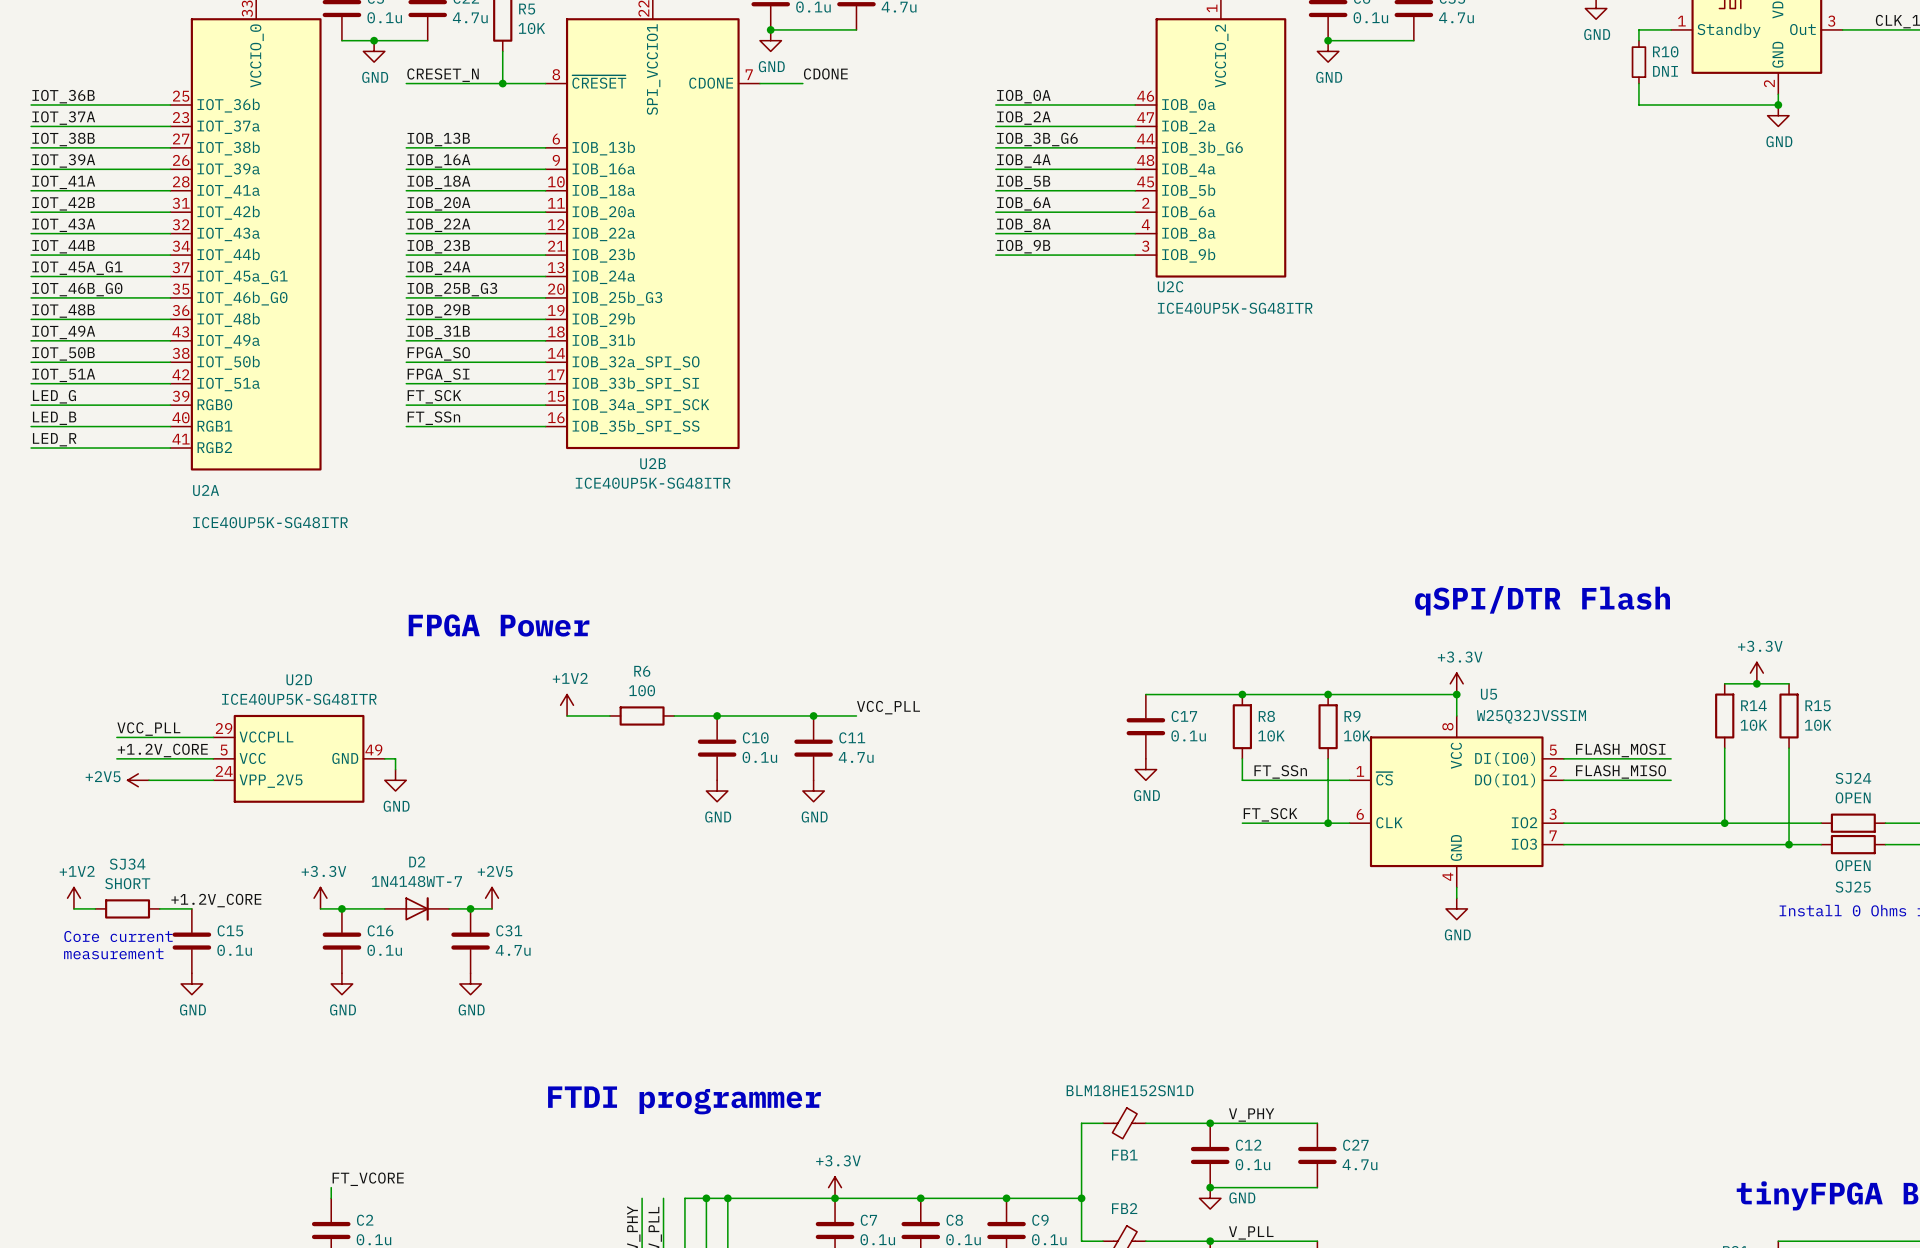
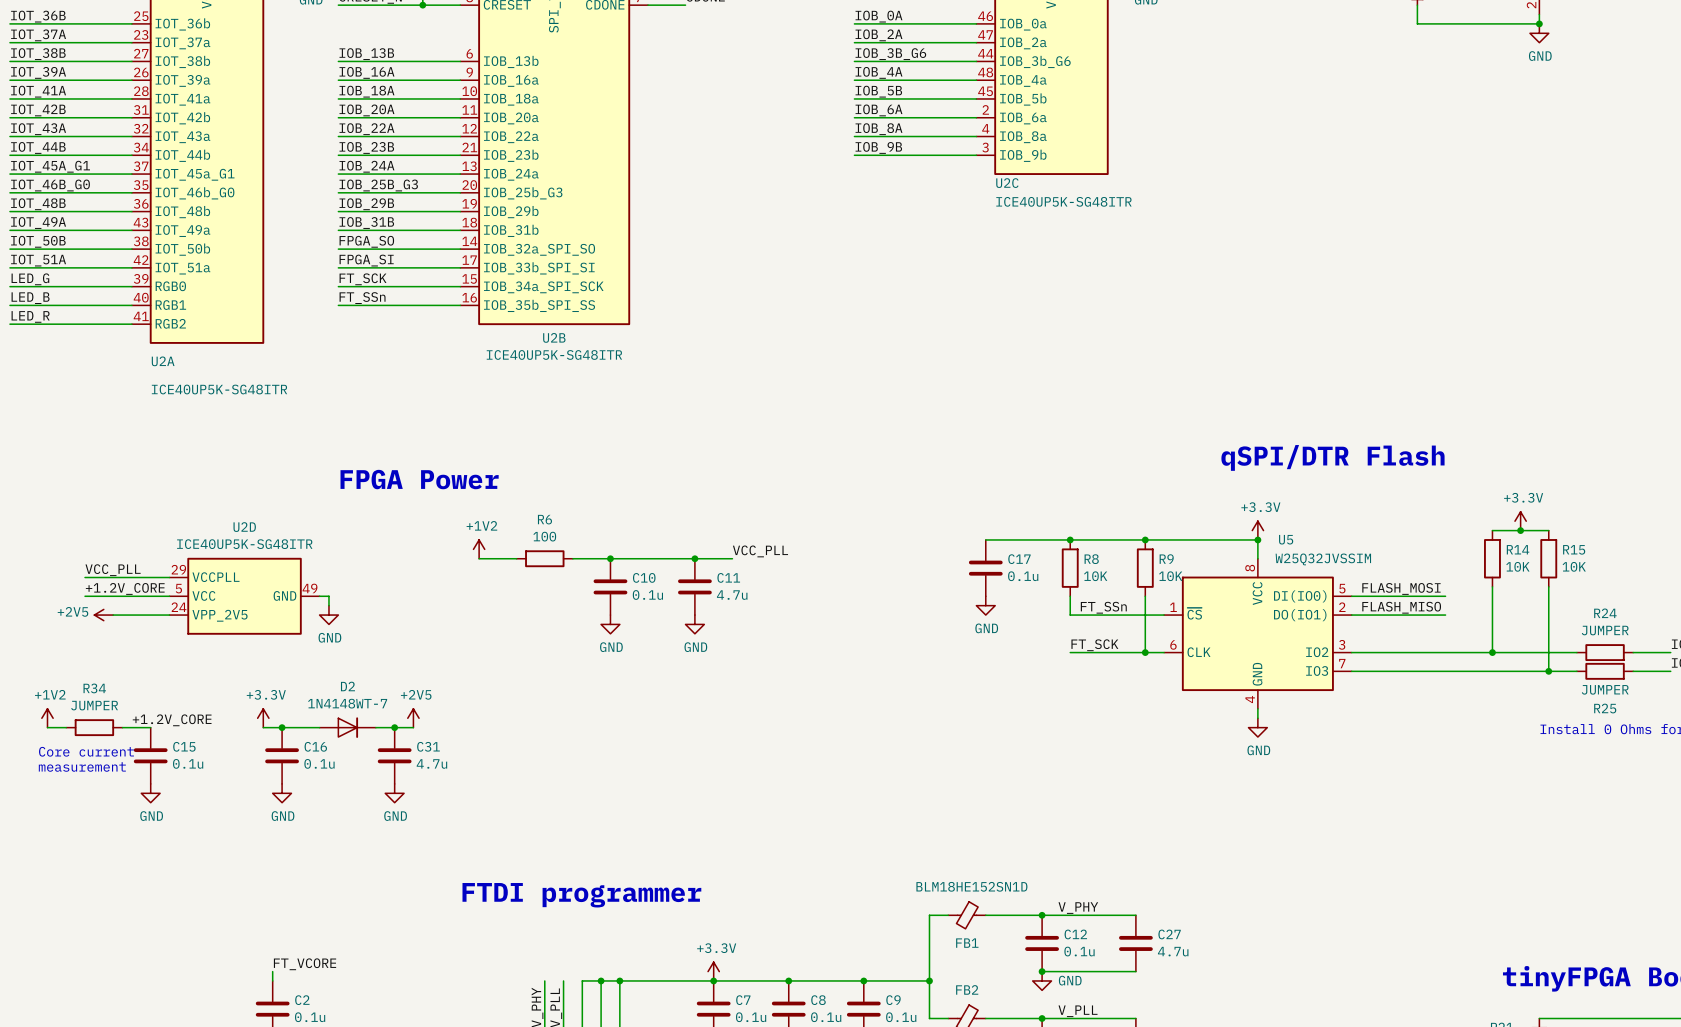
SJ24 name: SJ24 (1853, 778) -> R24 (1605, 613)
SJ24 value: OPEN (1853, 797) -> JUMPER (1605, 630)
SJ34 name: SJ34 (127, 864) -> R34 (94, 688)
SJ25 value: OPEN (1853, 865) -> JUMPER (1605, 689)
SJ34 value: SHORT (127, 883) -> JUMPER (94, 705)
SJ25 name: SJ25 (1853, 887) -> R25 (1605, 708)

